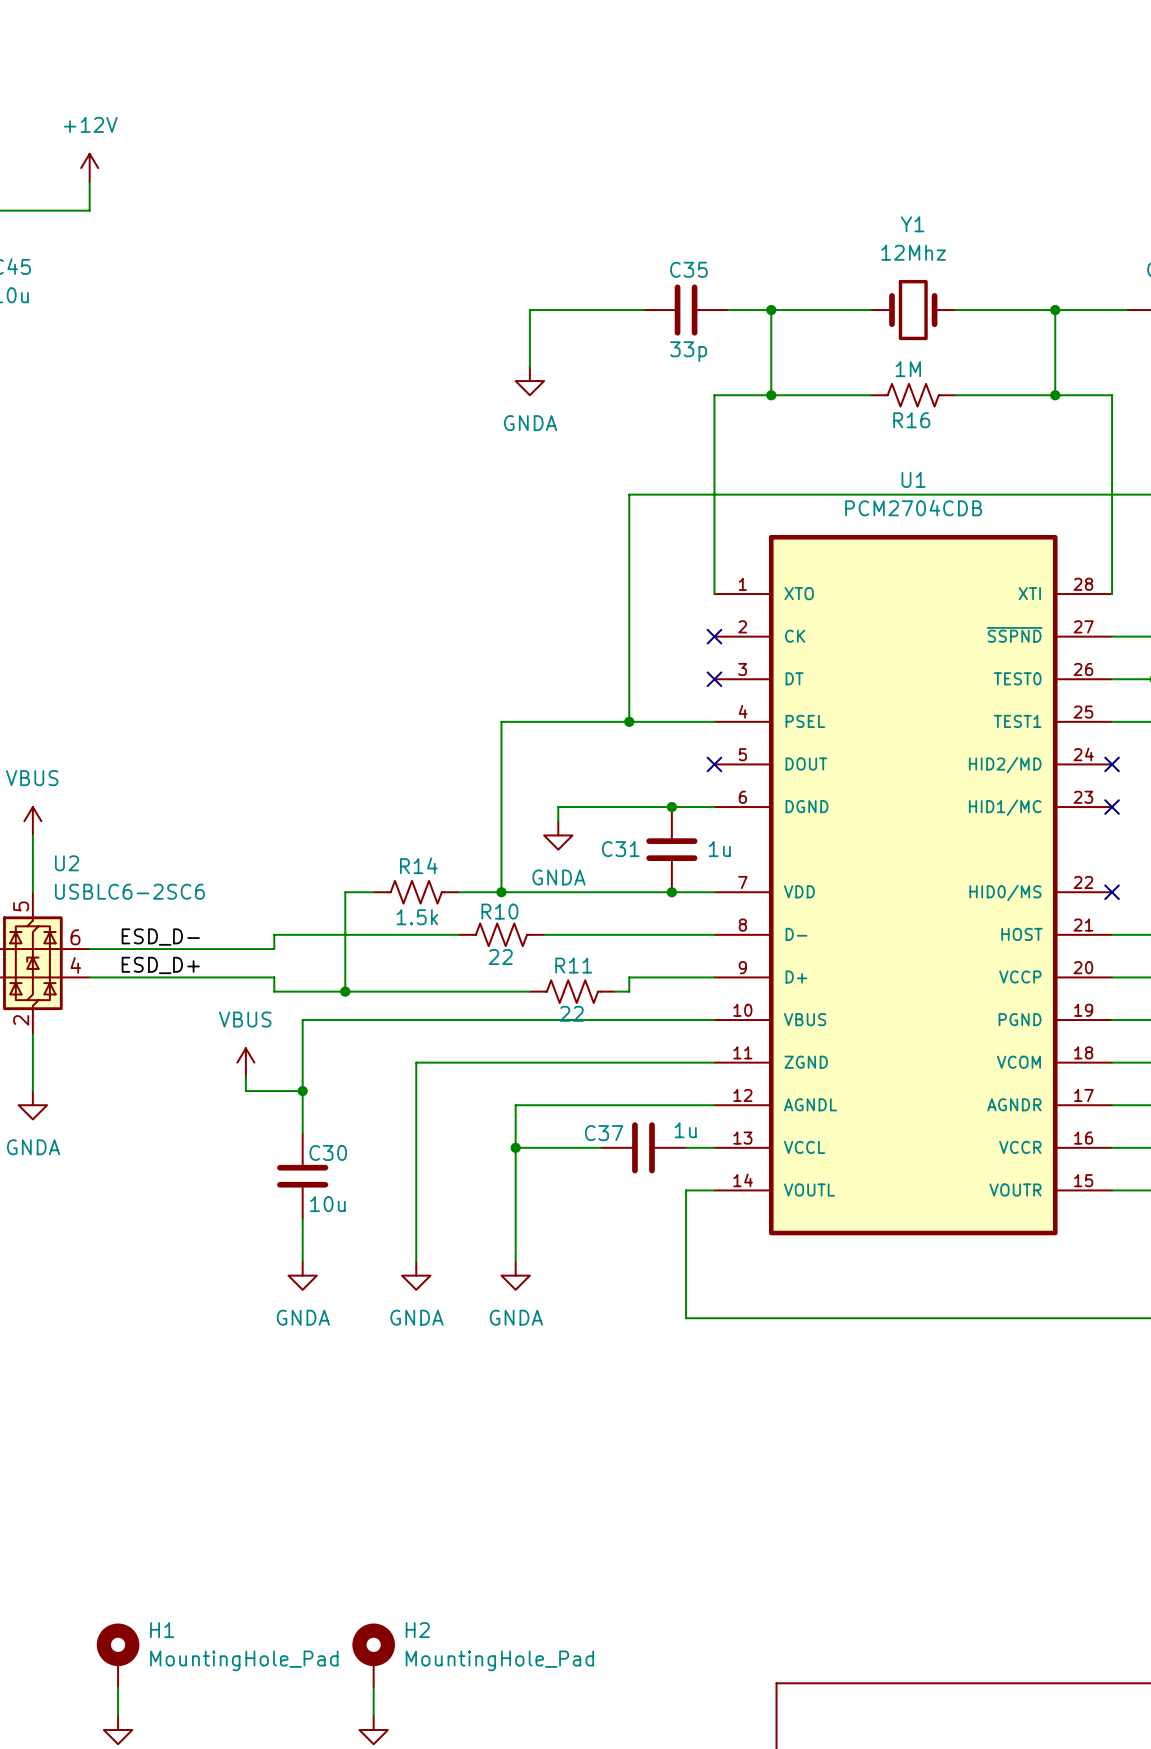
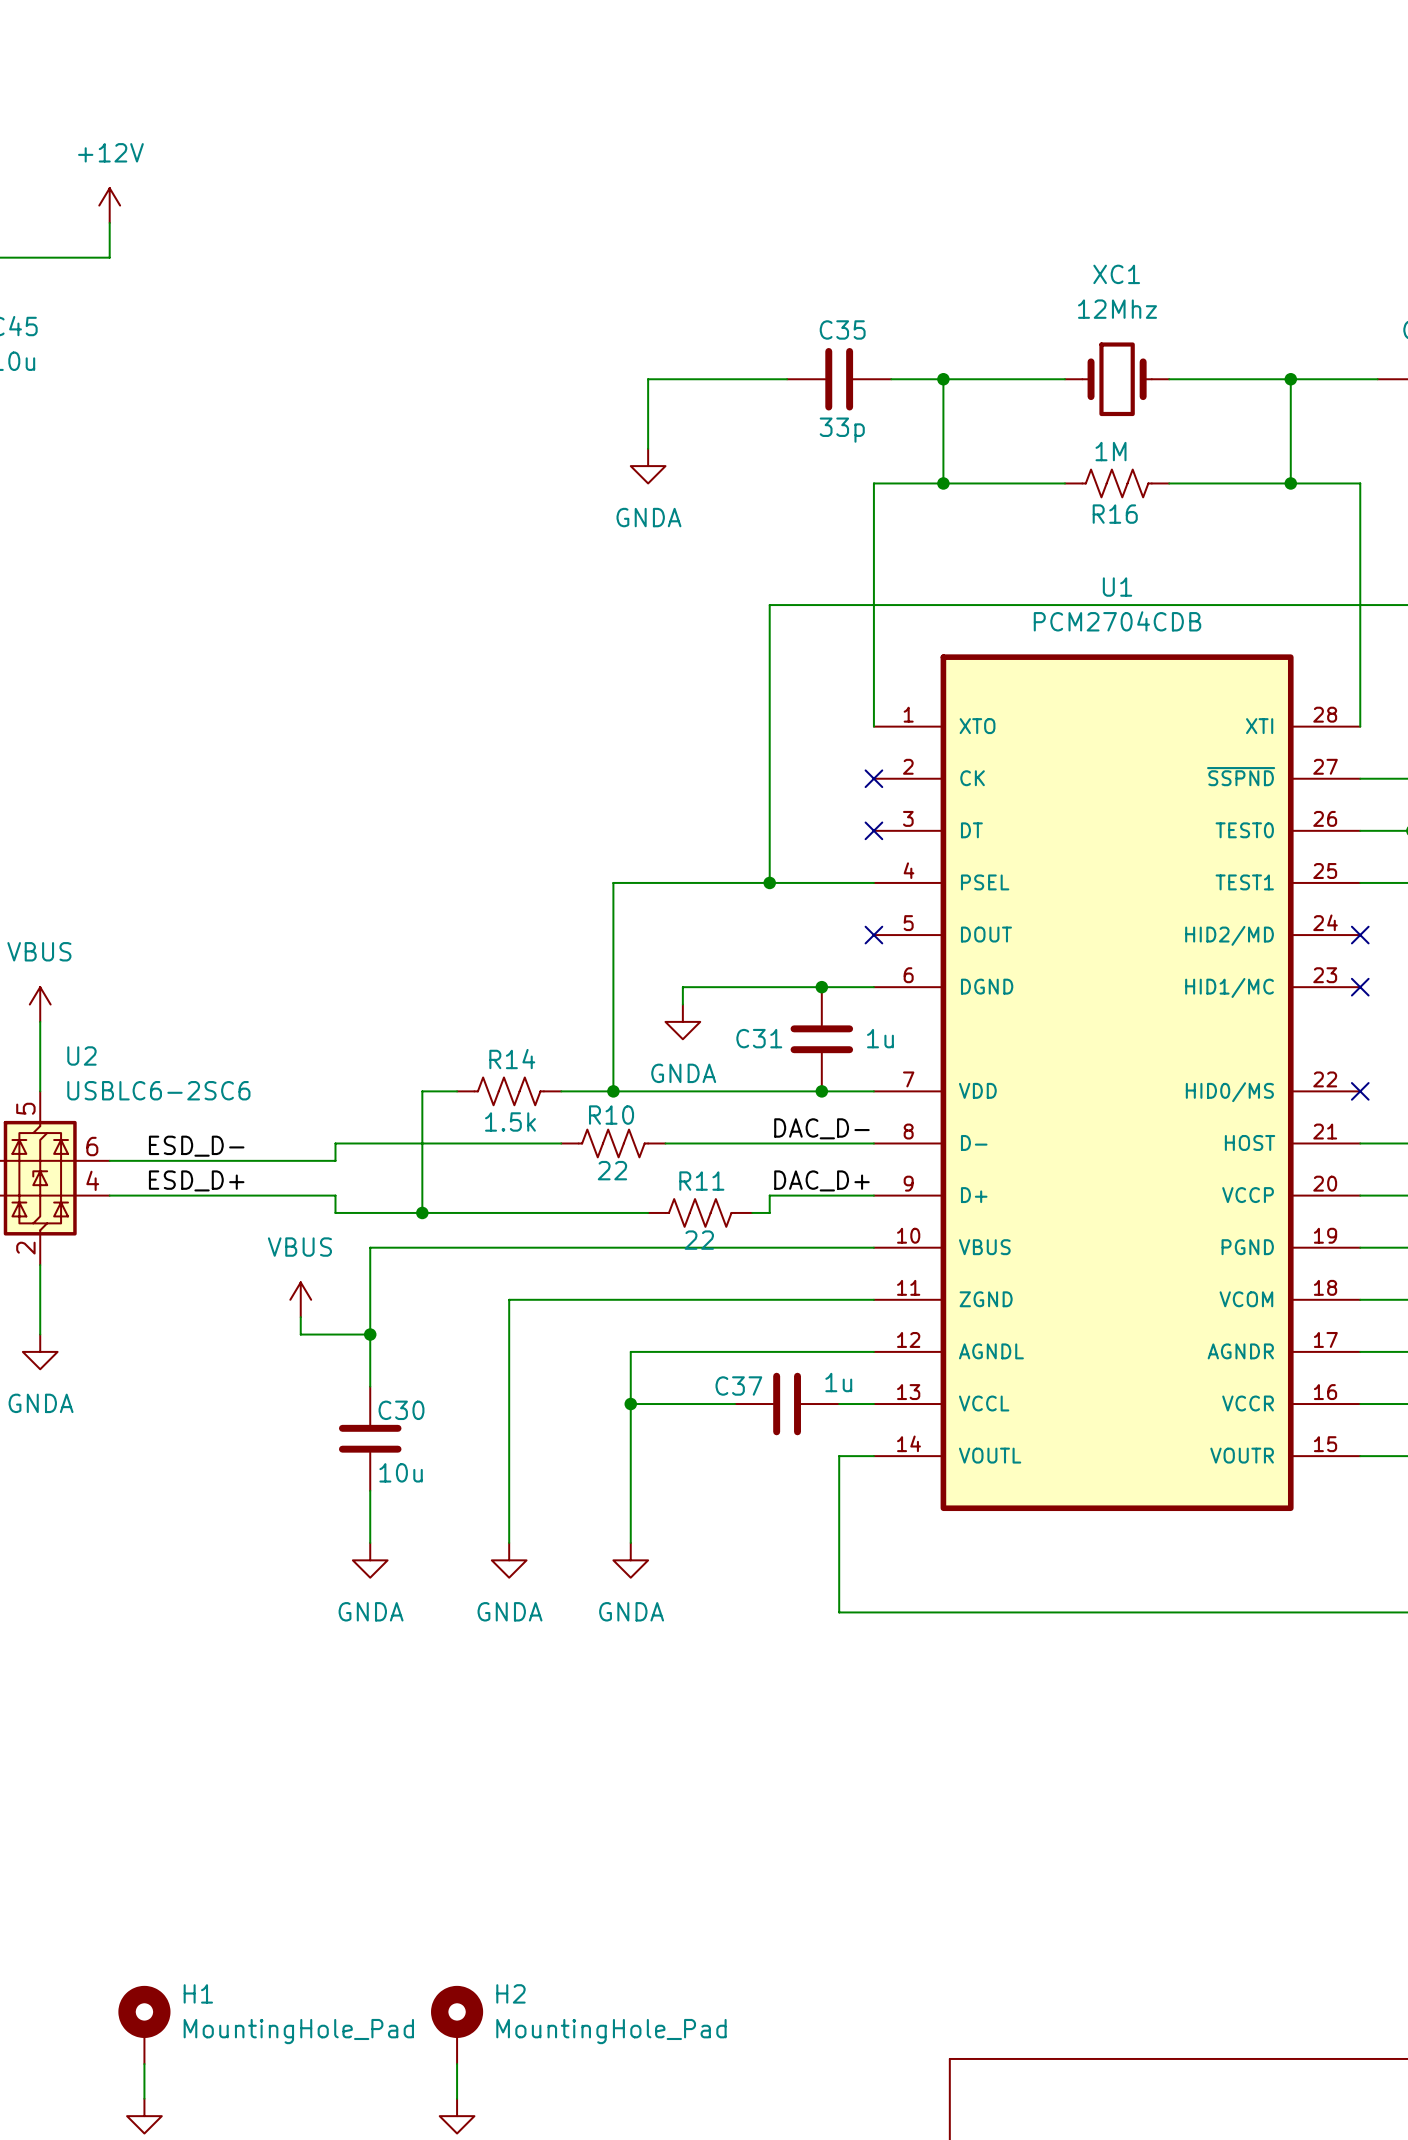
Y1 name: Y1 (912, 224) -> XC1 (1116, 274)
label: none -> DAC_D- (821, 1128)
label: none -> DAC_D+ (821, 1180)

